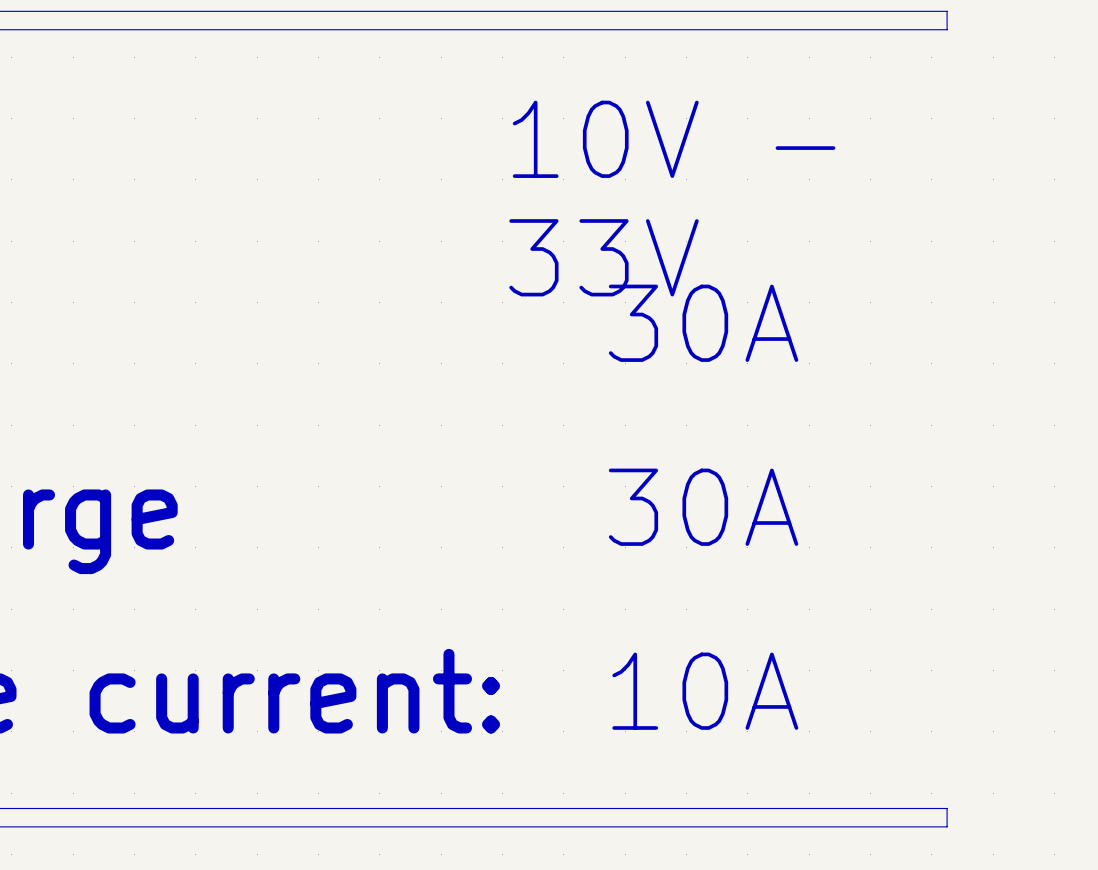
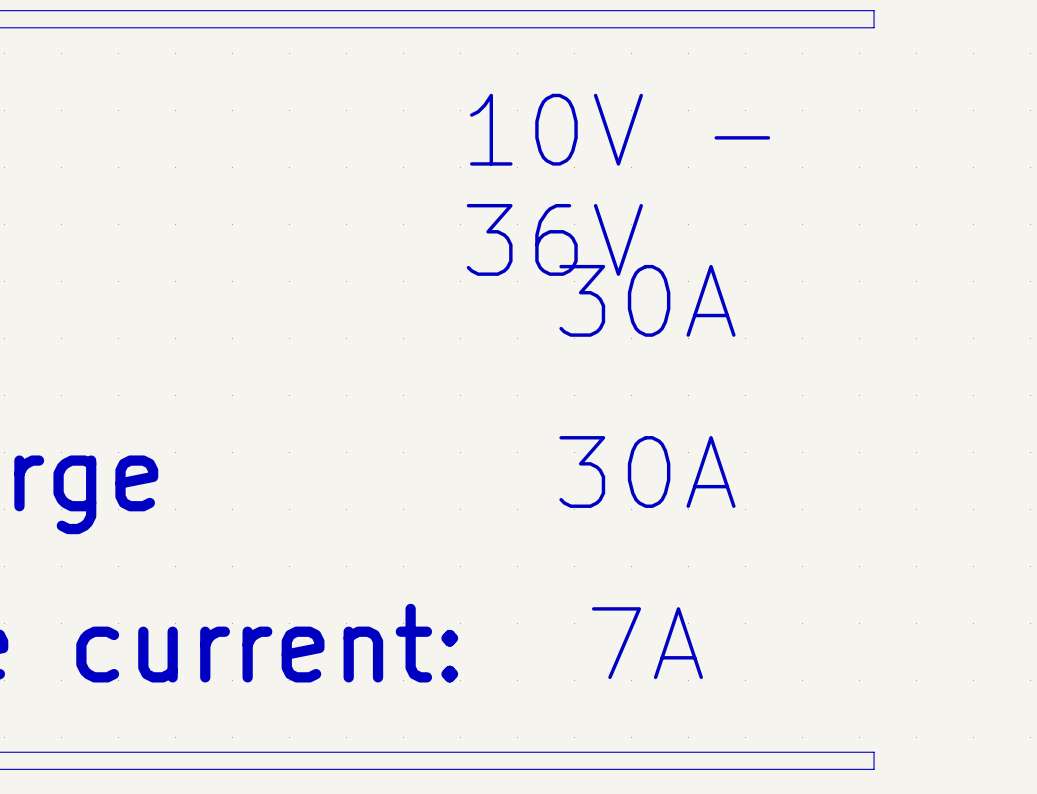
text: 33V (604, 257) -> 36V (554, 239)
text: 10A (705, 691) -> 7A (647, 643)

